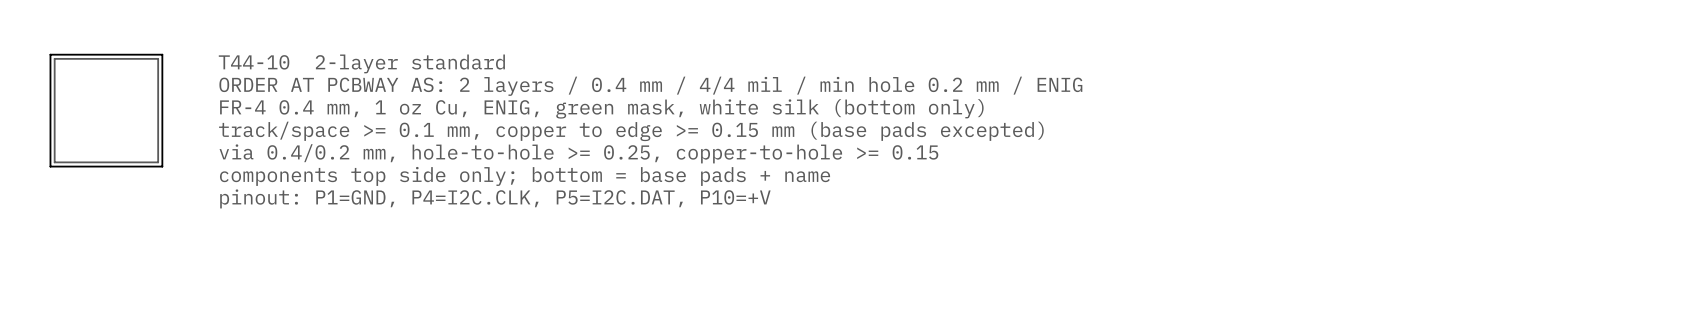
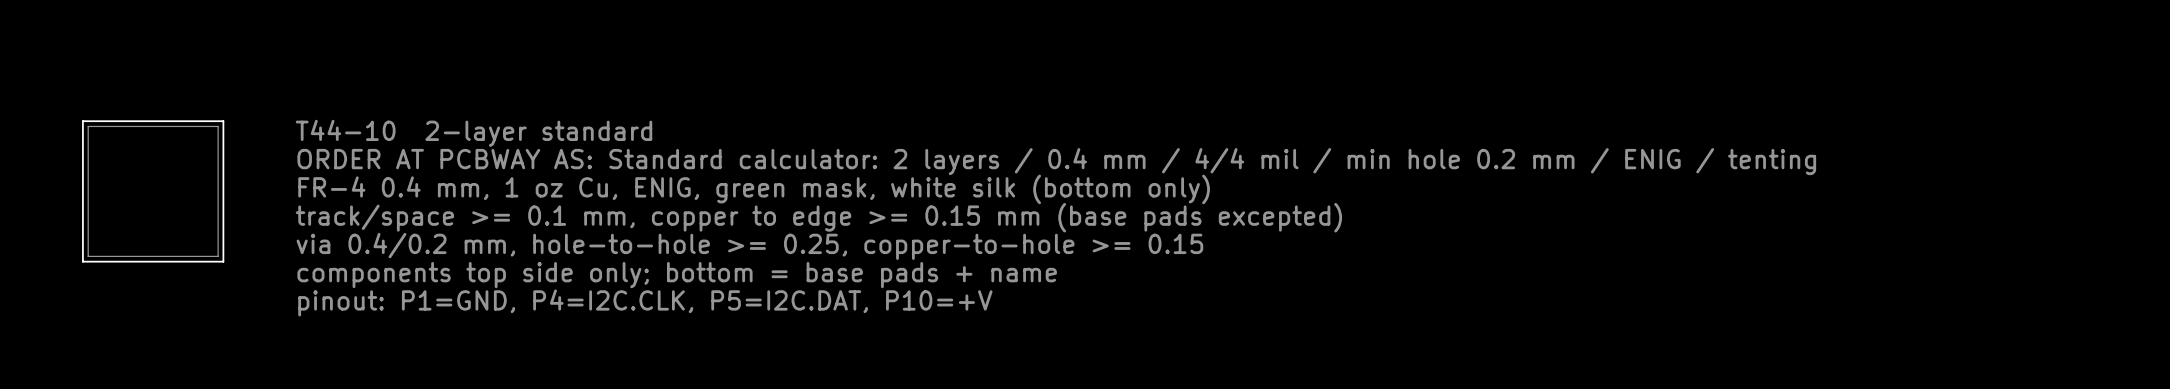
text: ORDER AT PCBWAY AS: 2 layers / 0.4 mm / 4/4 mil / min hole 0.2 mm / ENIG (650, 86) -> ORDER AT PCBWAY AS: Standard calculator: 2 layers / 0.4 mm / 4/4 mil / min hole 0.2 mm / ENIG / tenting (1056, 161)

